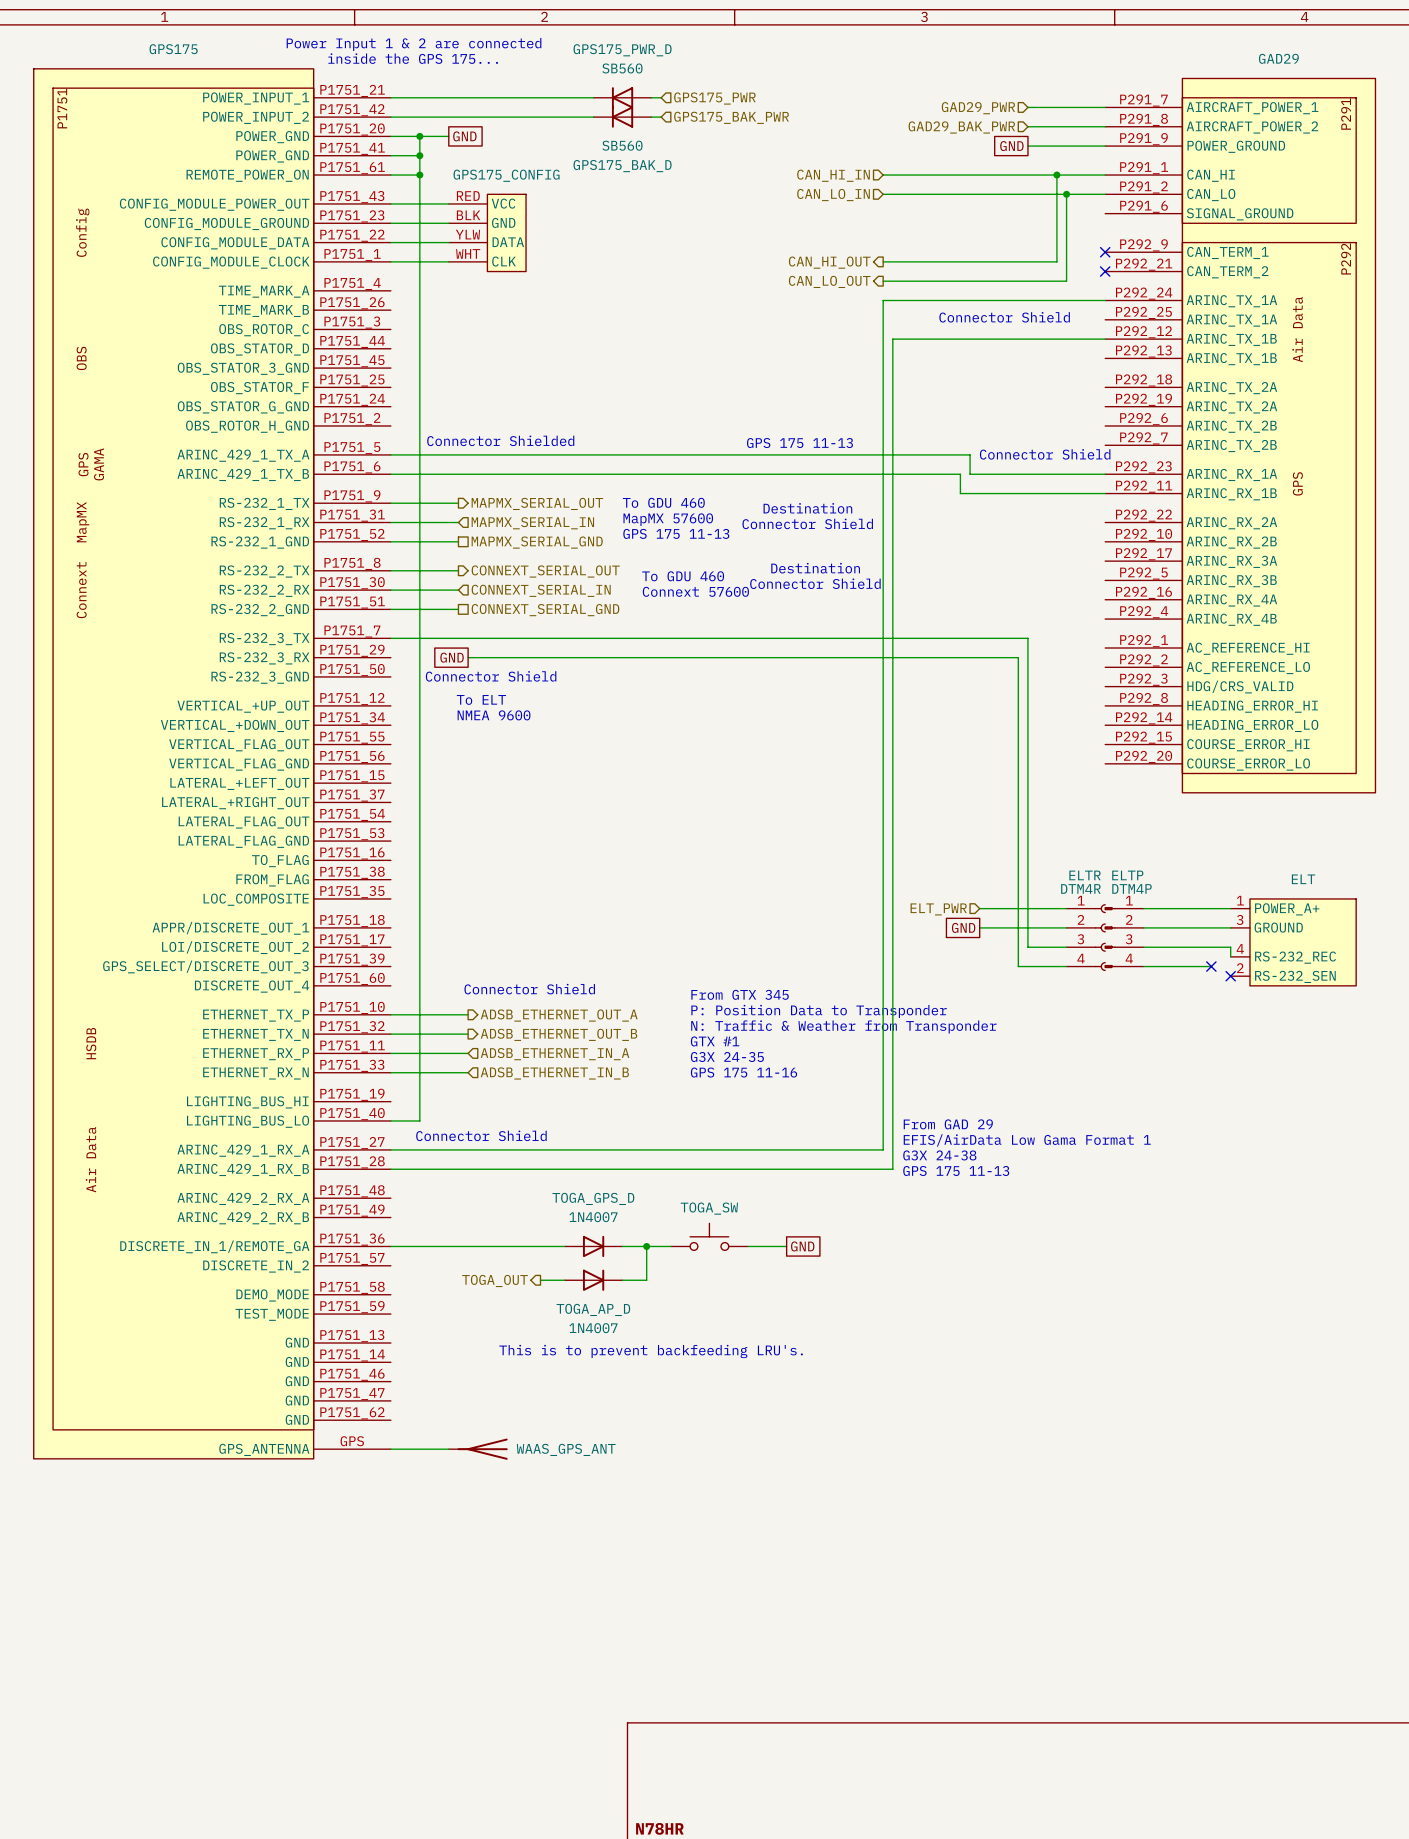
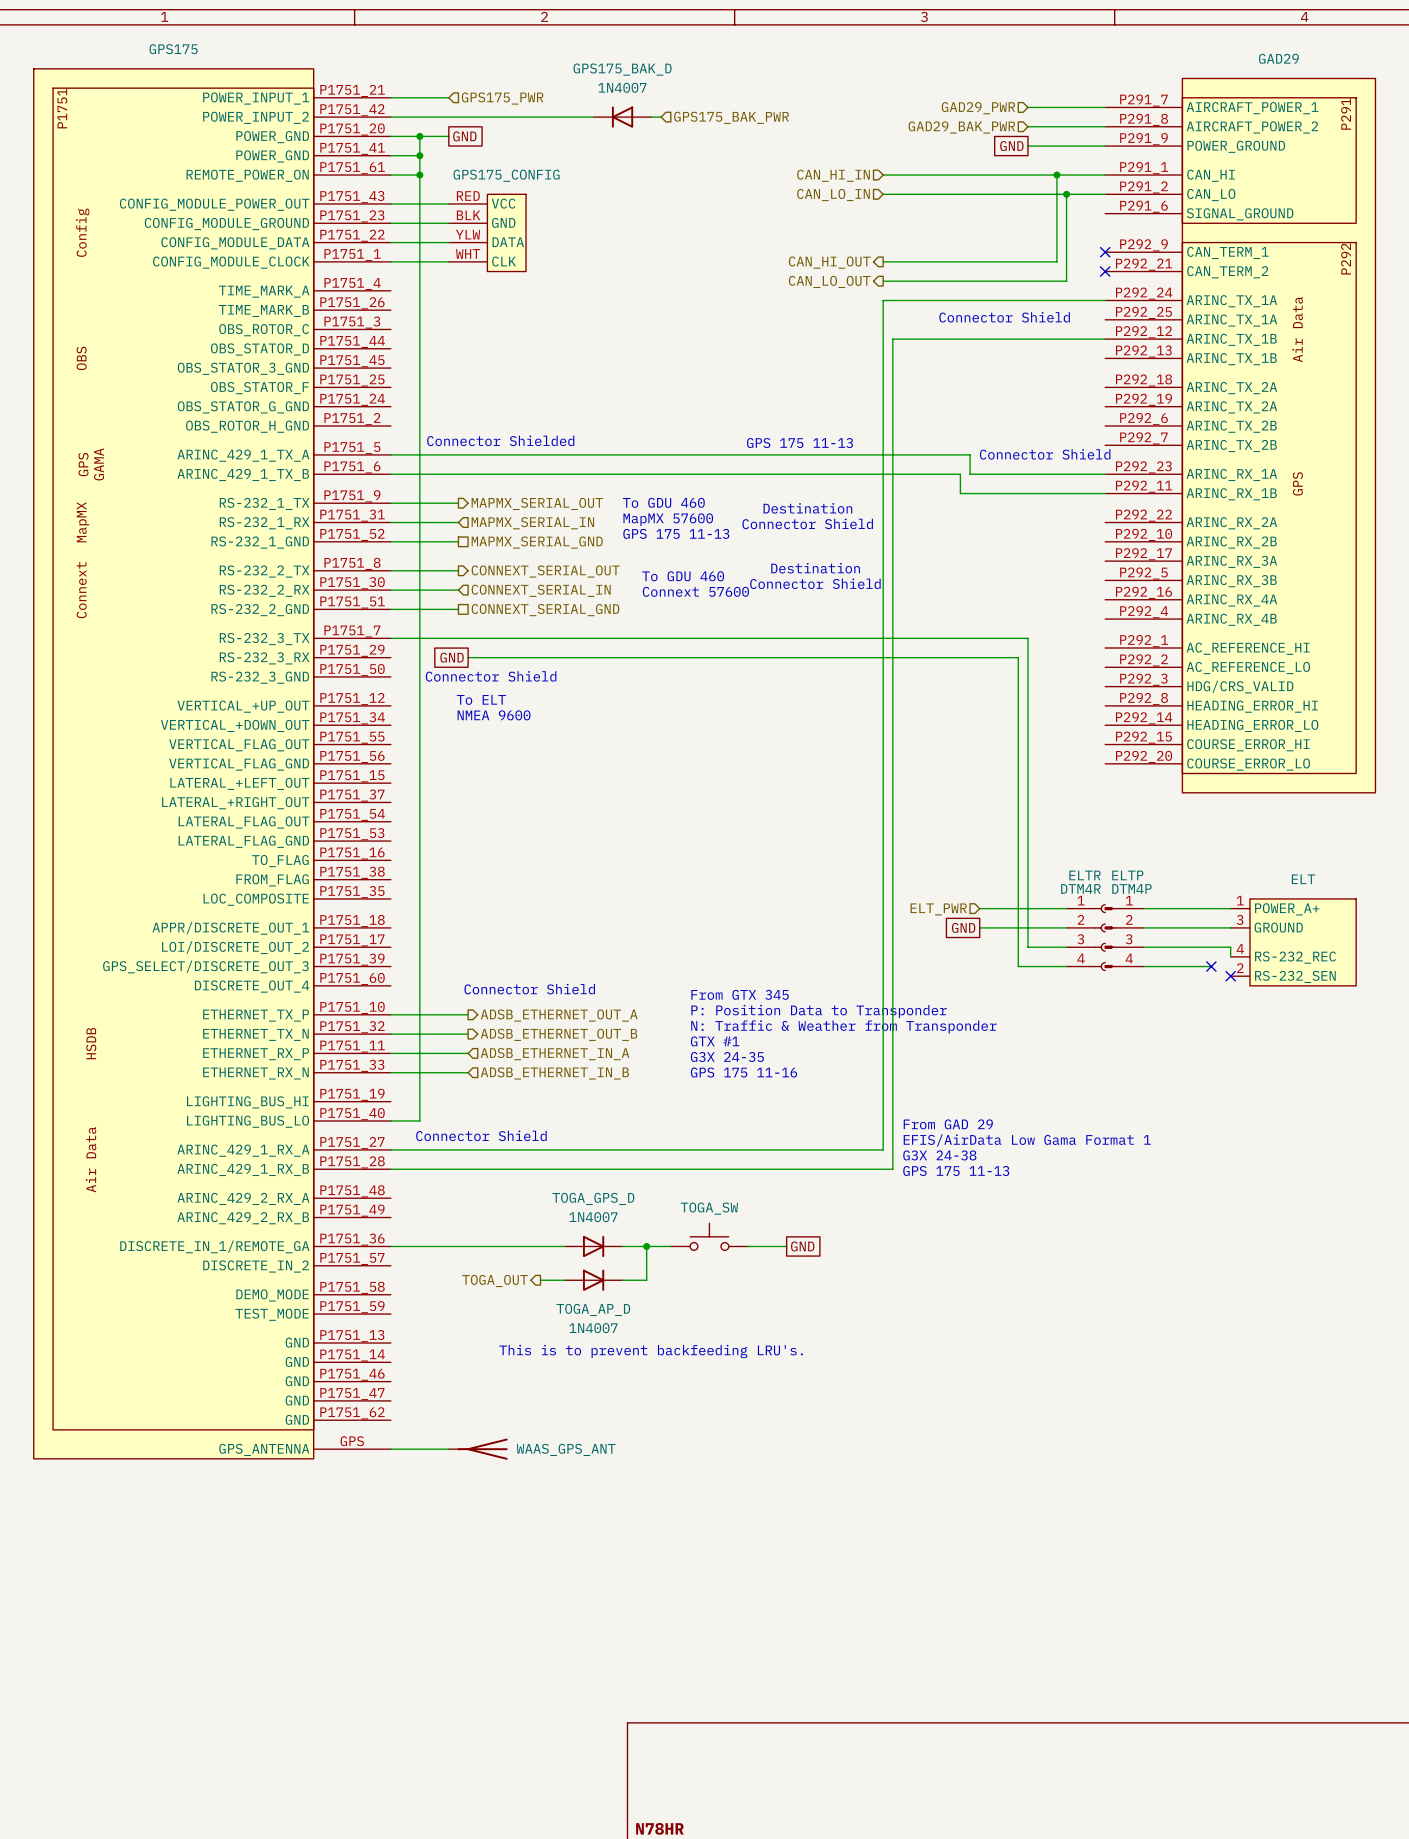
text: Power Input 1 & 2 are connected (414, 44) -> none
text: inside the GPS 175... (413, 58) -> none
wire: (448, 97) (593, 97) -> none
GPS175_PWR_D: SB560 (622, 97) -> none
wire: (651, 97) (661, 97) -> none
hierarchical label: none -> GPS175_PWR (502, 98)
hierarchical label: GPS175_PWR (714, 98) -> none
GPS175_BAK_D value: SB560 (622, 145) -> 1N4007 (622, 87)
GPS175_BAK_D name position: GPS175_BAK_D (622, 166) -> GPS175_BAK_D (622, 69)

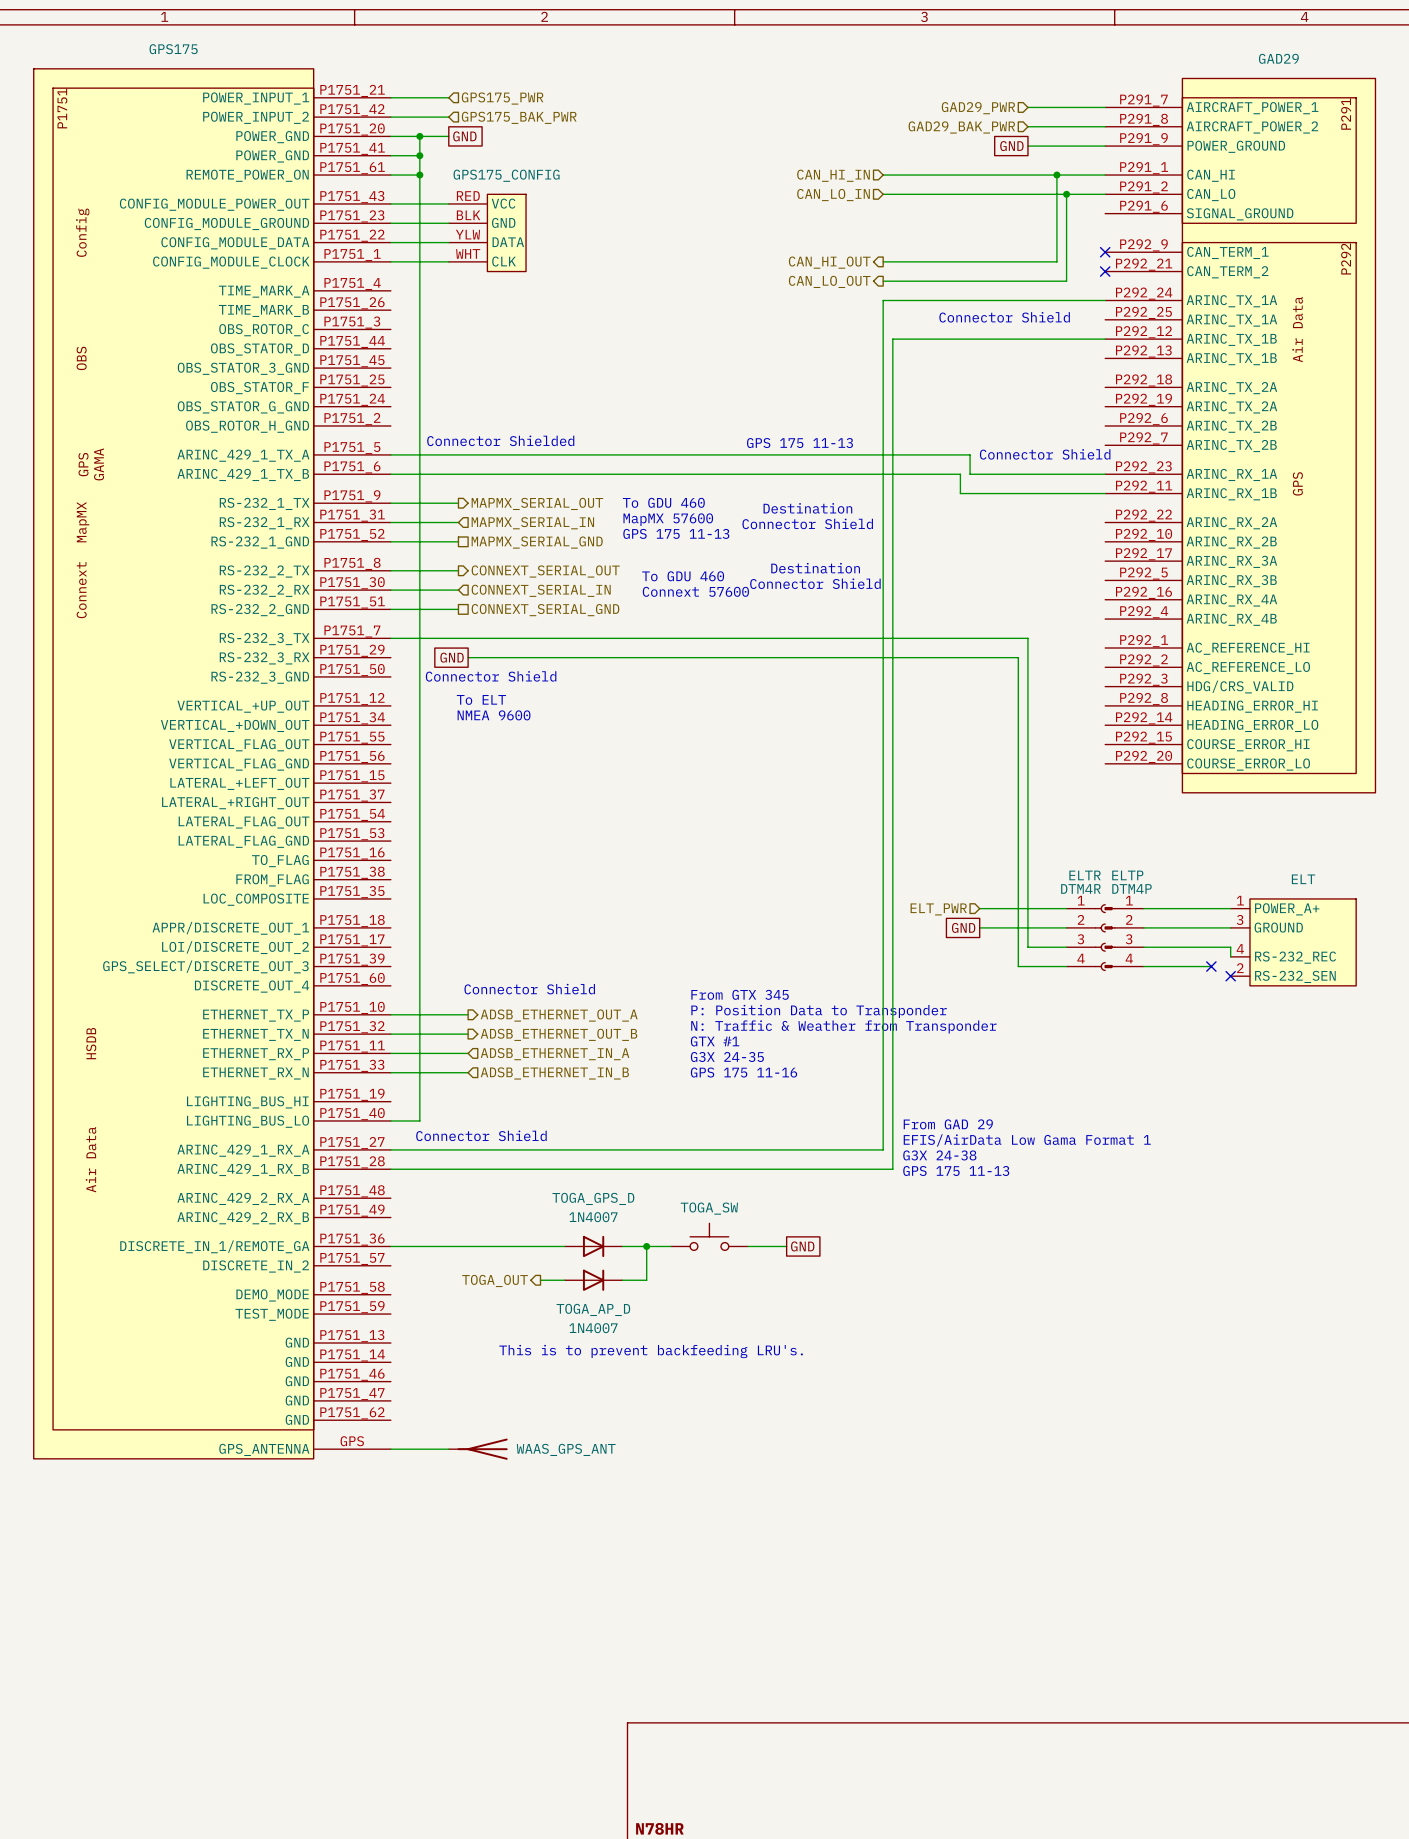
wire: (448, 117) (593, 117) -> none
hierarchical label: none -> GPS175_BAK_PWR (519, 117)
GPS175_BAK_D: 1N4007 (622, 117) -> none
wire: (651, 117) (661, 117) -> none
hierarchical label: GPS175_BAK_PWR (731, 117) -> none

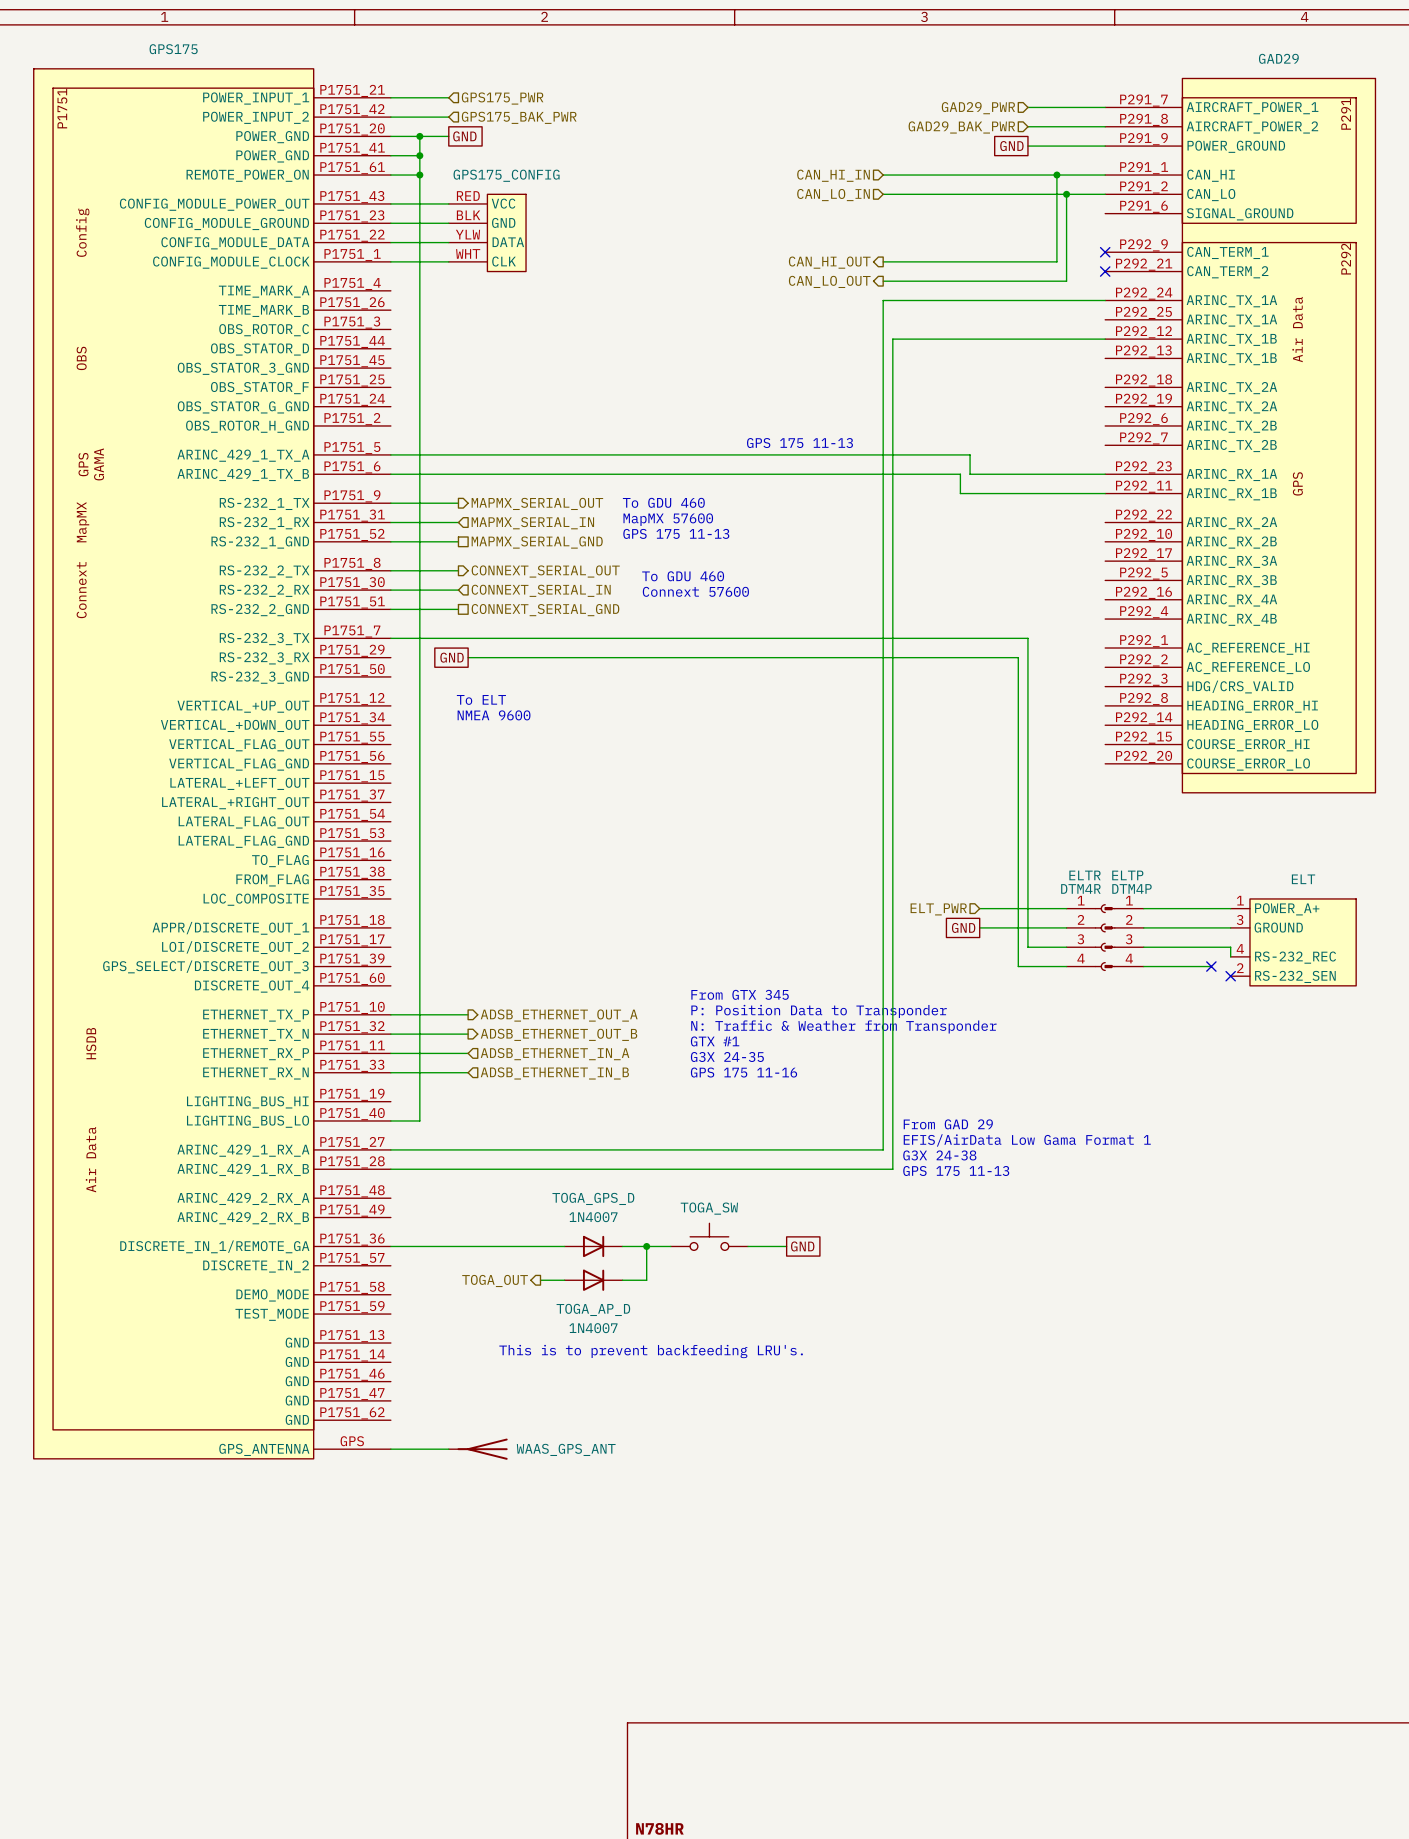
text: Connector Shield (1004, 317) -> none
text: Connector Shielded (500, 440) -> none
text: Connector Shield (1045, 454) -> none
text: Destination (807, 508) -> none
text: Connector Shield (807, 523) -> none
text: Destination (815, 568) -> none
text: Connector Shield (815, 583) -> none
text: Connector Shield (491, 676) -> none
text: Connector Shield (529, 989) -> none
text: Connector Shield (481, 1135) -> none

